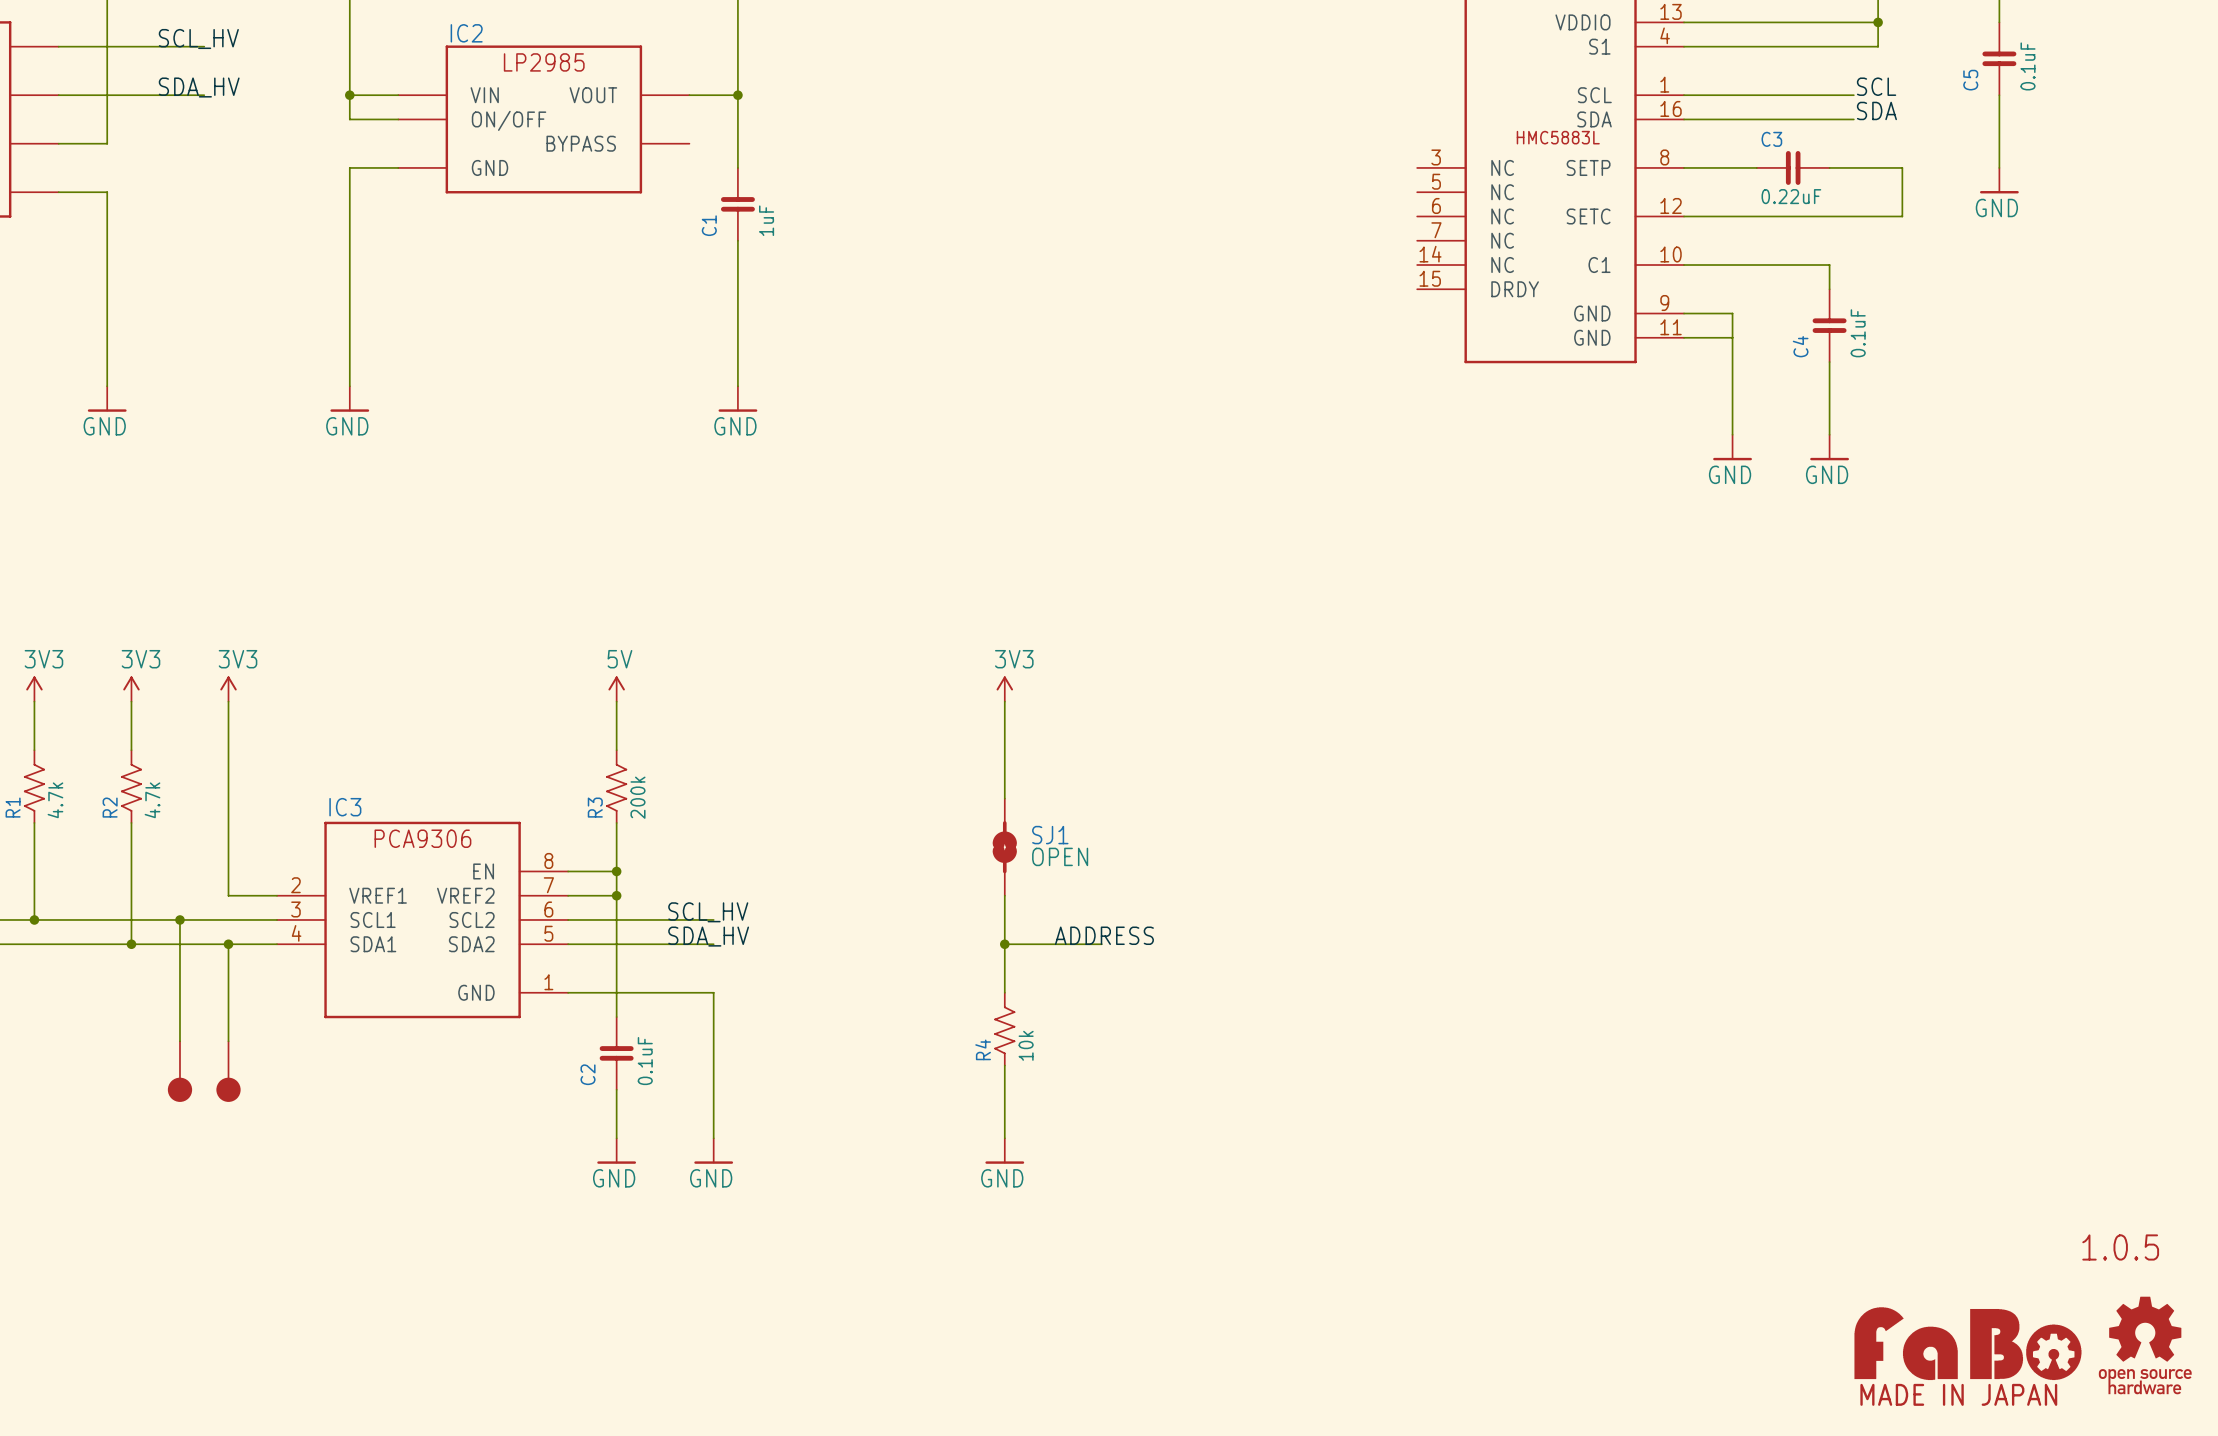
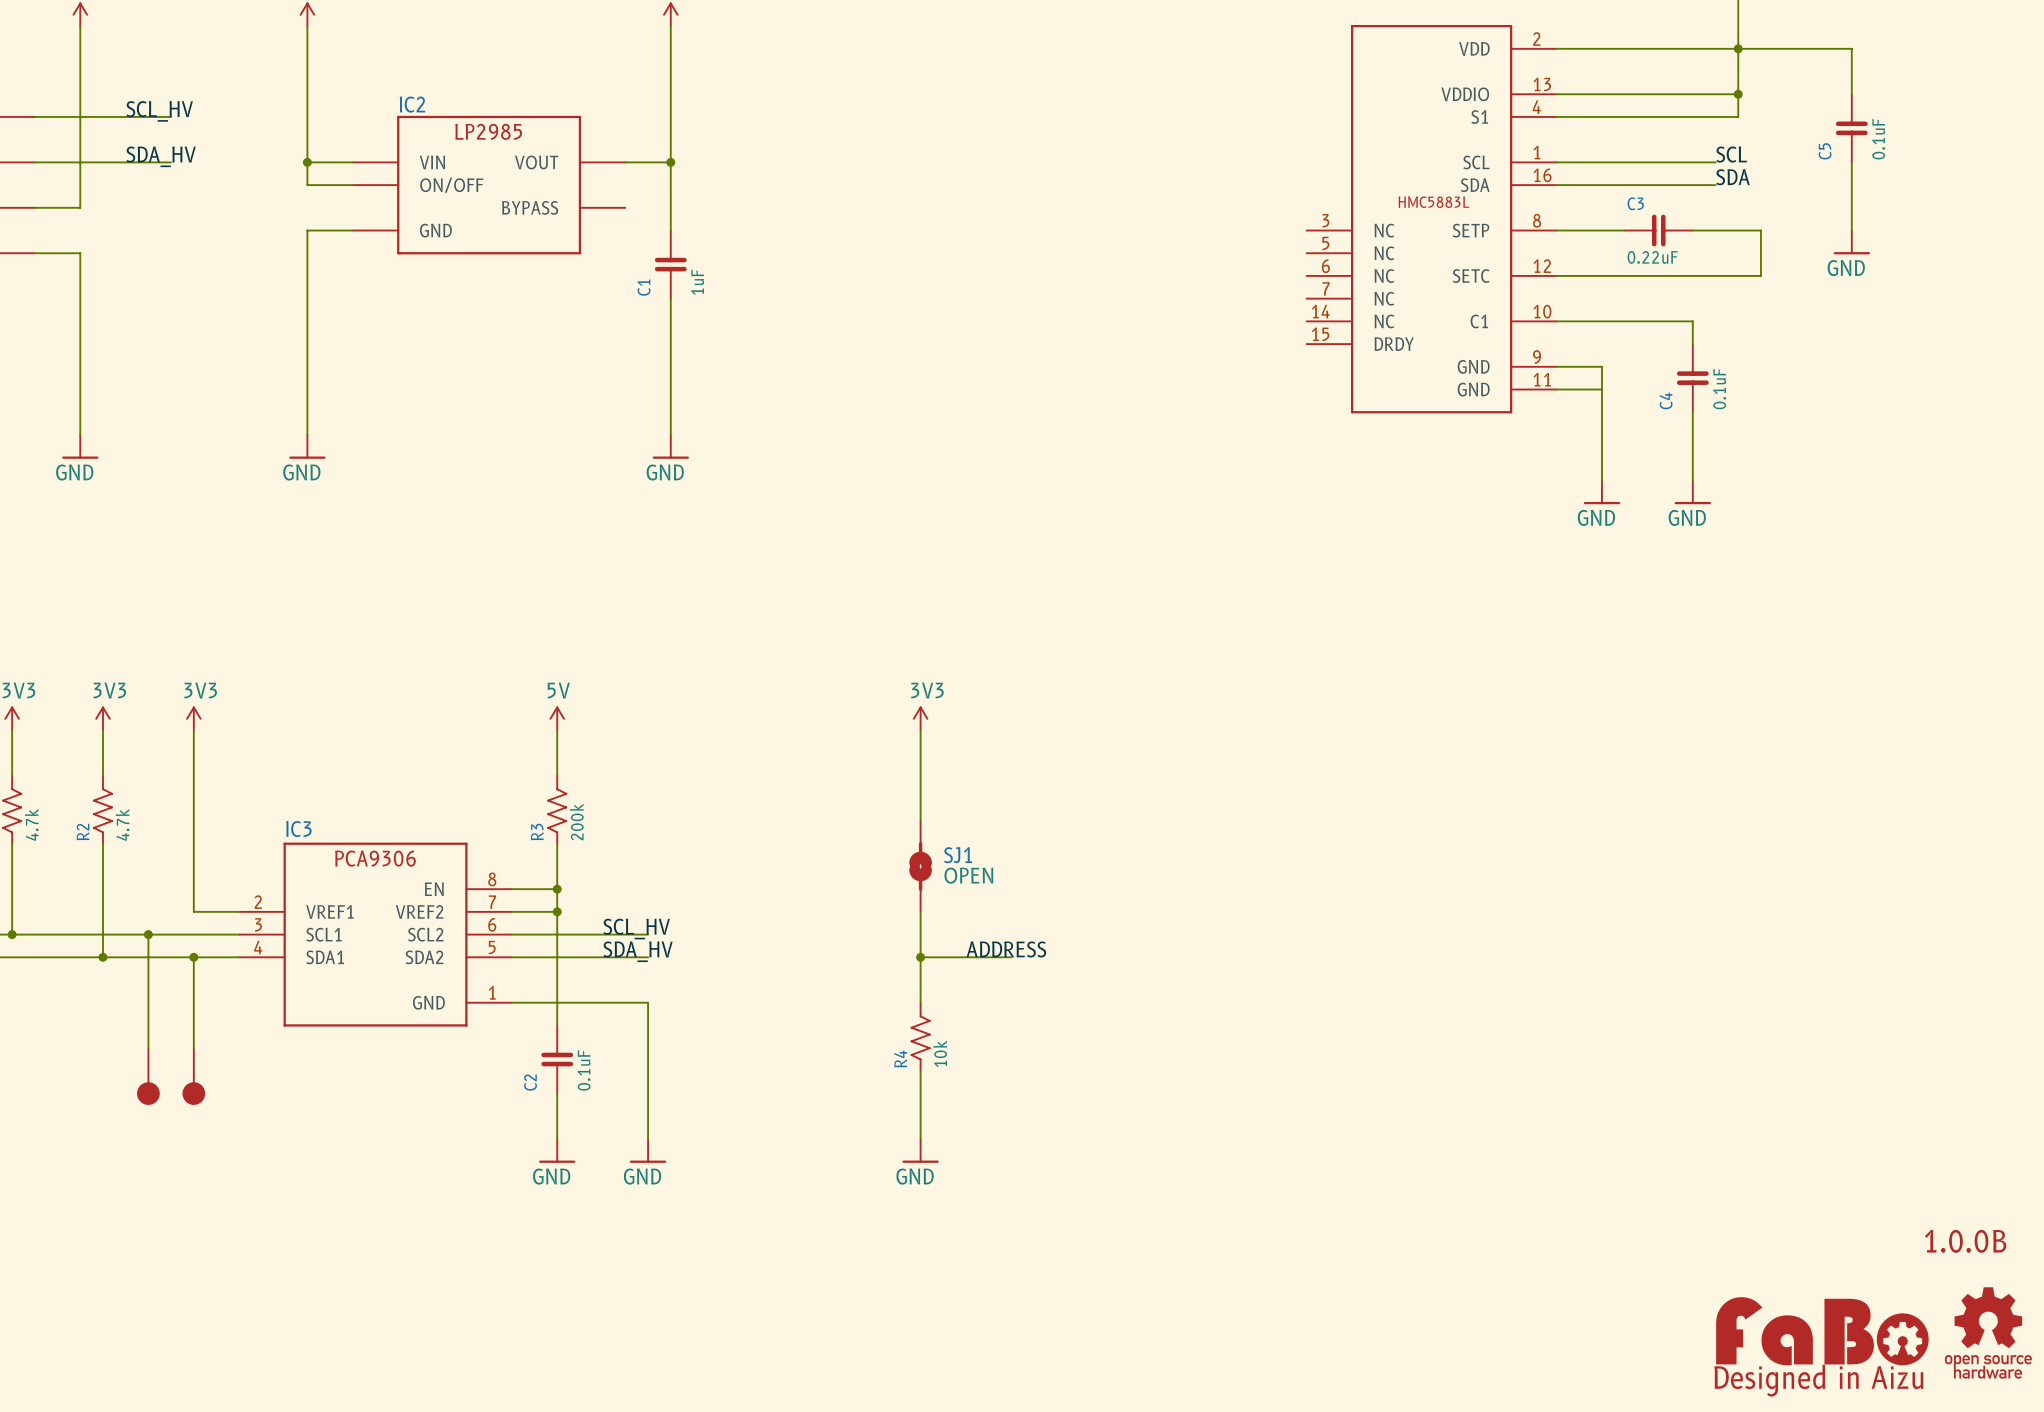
text: 1.0.5 (2120, 1247) -> 1.0.0B (1965, 1241)
part text: MADE IN JAPAN (1958, 1394) -> none
part text: none -> Designed in Aizu (1818, 1380)

